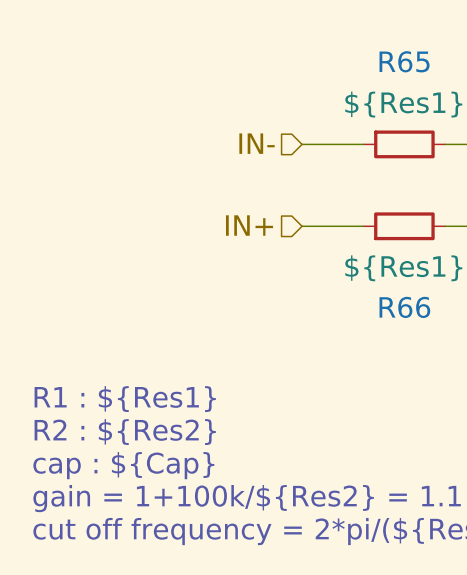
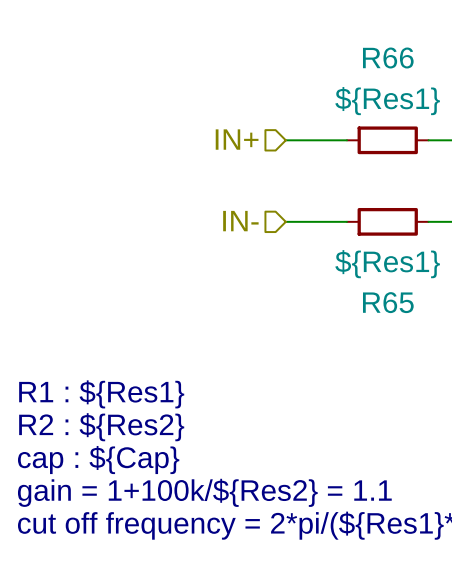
R65 name: R65 (404, 61) -> R66 (388, 58)
hierarchical label: IN- (257, 143) -> IN+ (237, 139)
hierarchical label: IN+ (249, 225) -> IN- (240, 221)
R66 name: R66 (404, 307) -> R65 (388, 302)

